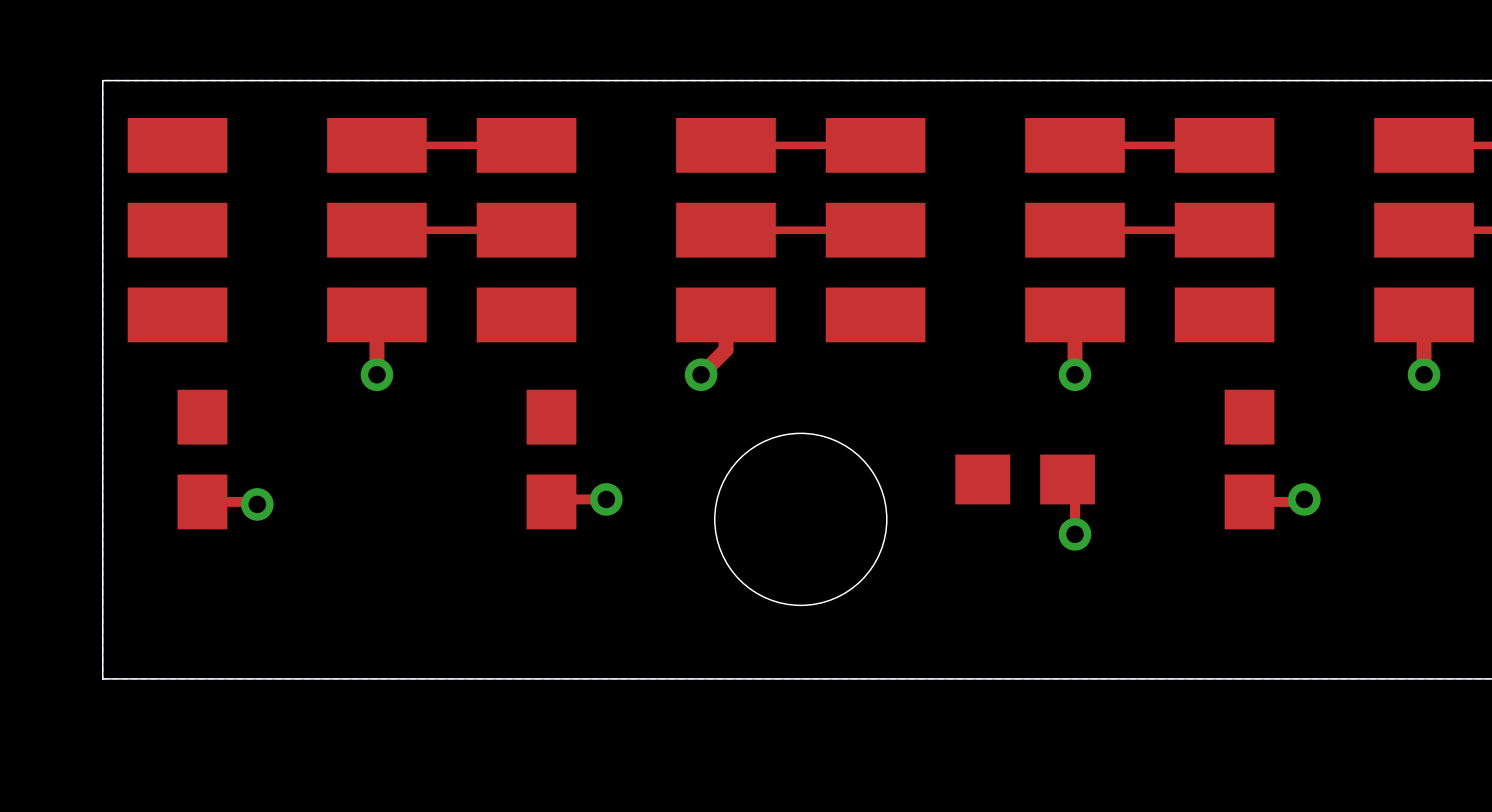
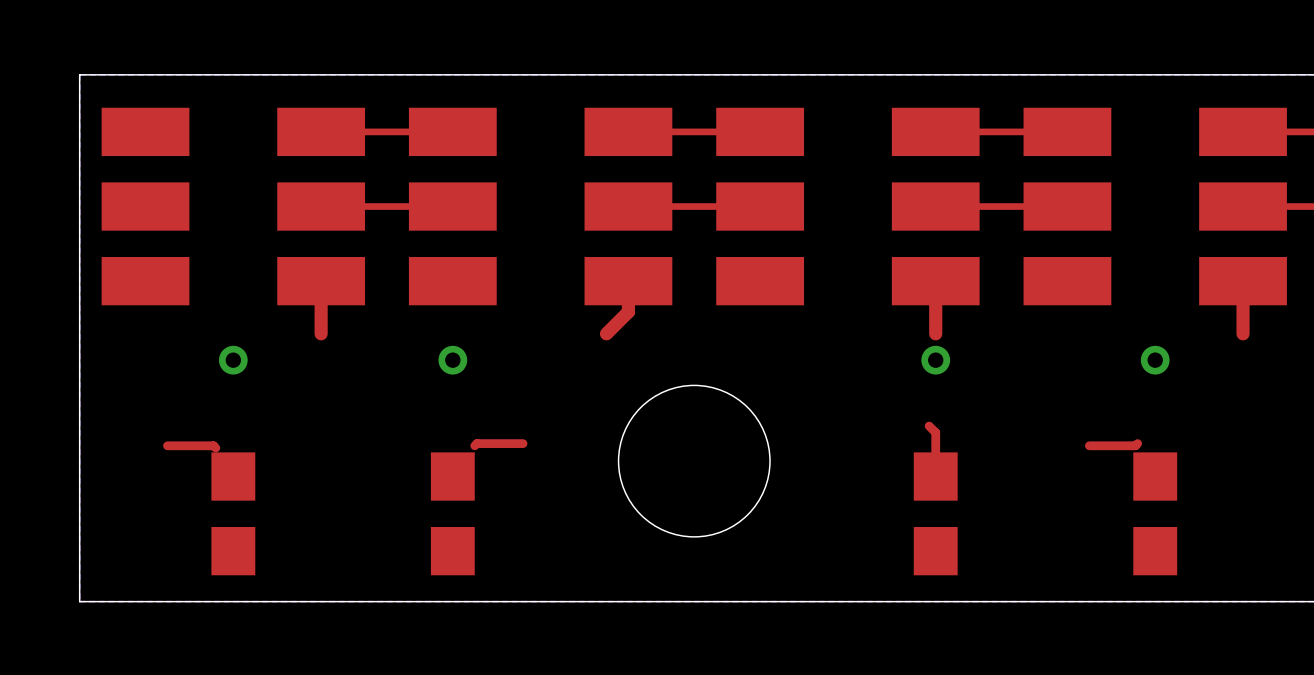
via: (376, 374) -> none
via: (701, 374) -> none
via position: (1075, 374) -> (935, 360)
via: (1424, 374) -> none
via: none -> (233, 360)
via: none -> (452, 360)
via: none -> (1155, 360)
part position: (202, 459) -> (233, 513)
part position: (551, 459) -> (452, 513)
part: (1249, 459) -> none
part: (1025, 479) -> none
via: (606, 499) -> none
via: (1304, 499) -> none
via: (257, 504) -> none
via: (1075, 534) -> none
part: none -> (935, 513)
part: none -> (1155, 513)

